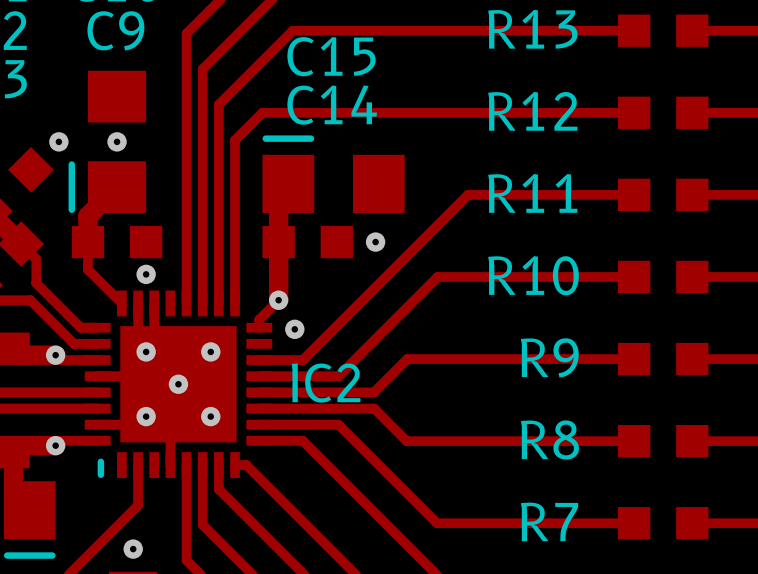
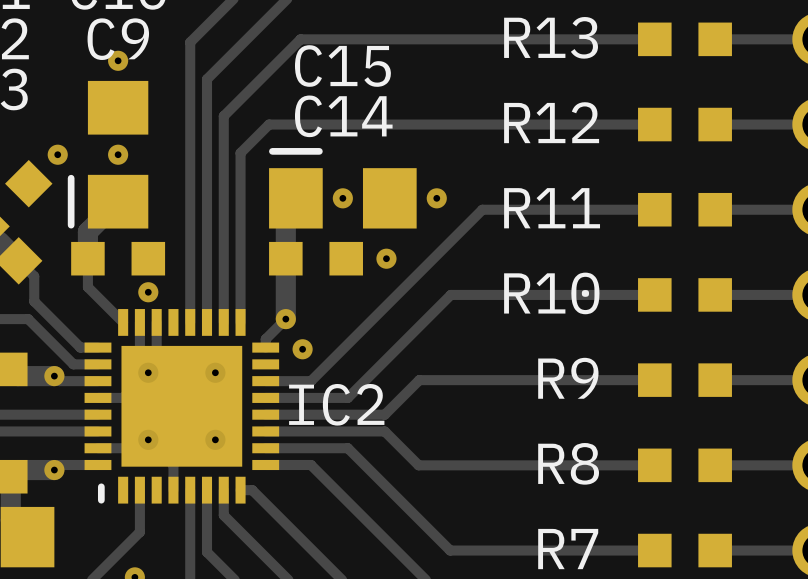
via: none -> (118, 60)
via: none -> (342, 198)
via: none -> (436, 198)
via: (178, 384) -> none

